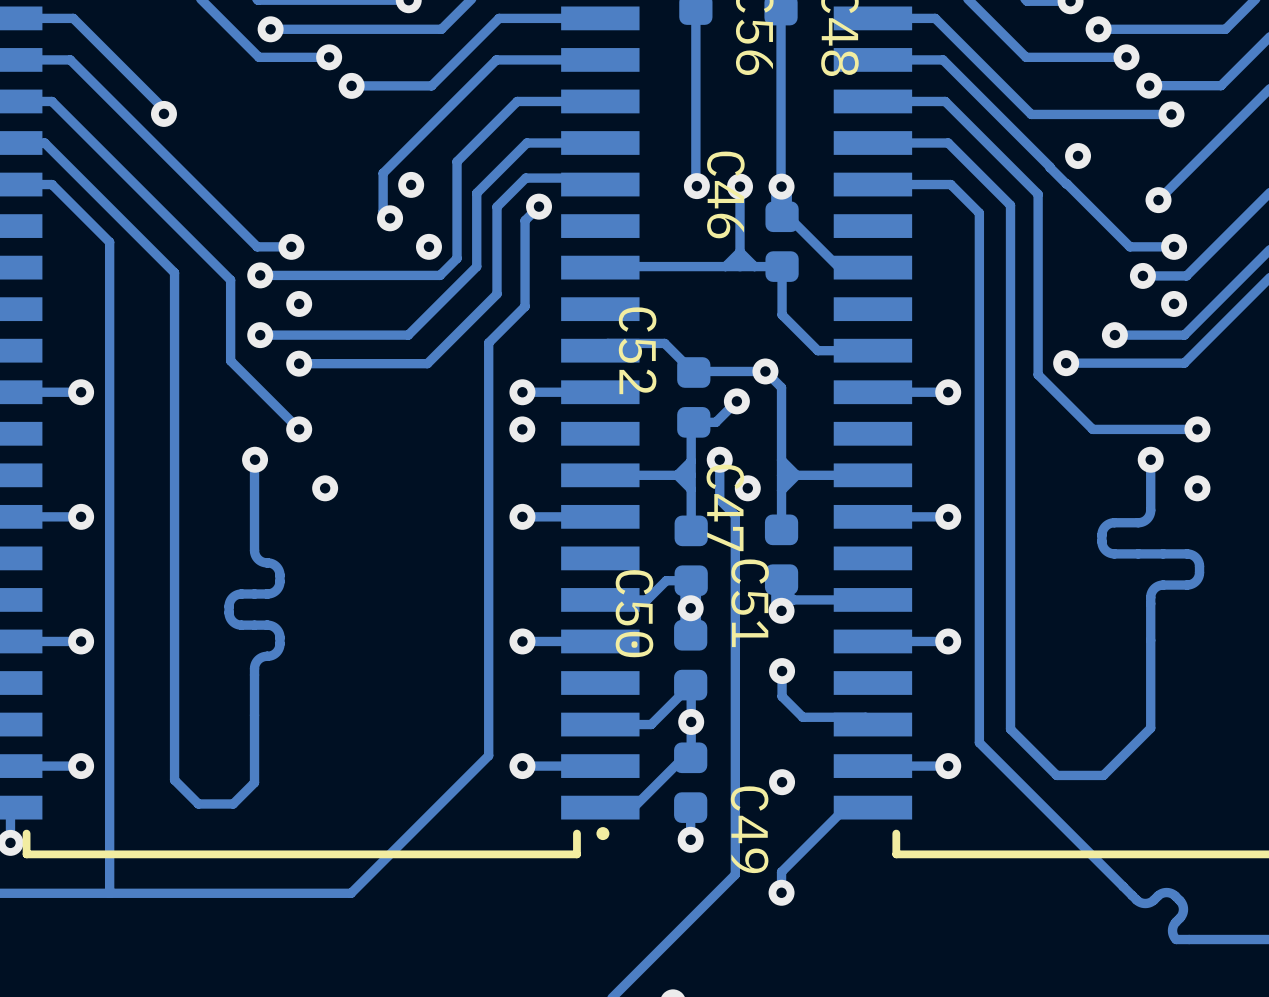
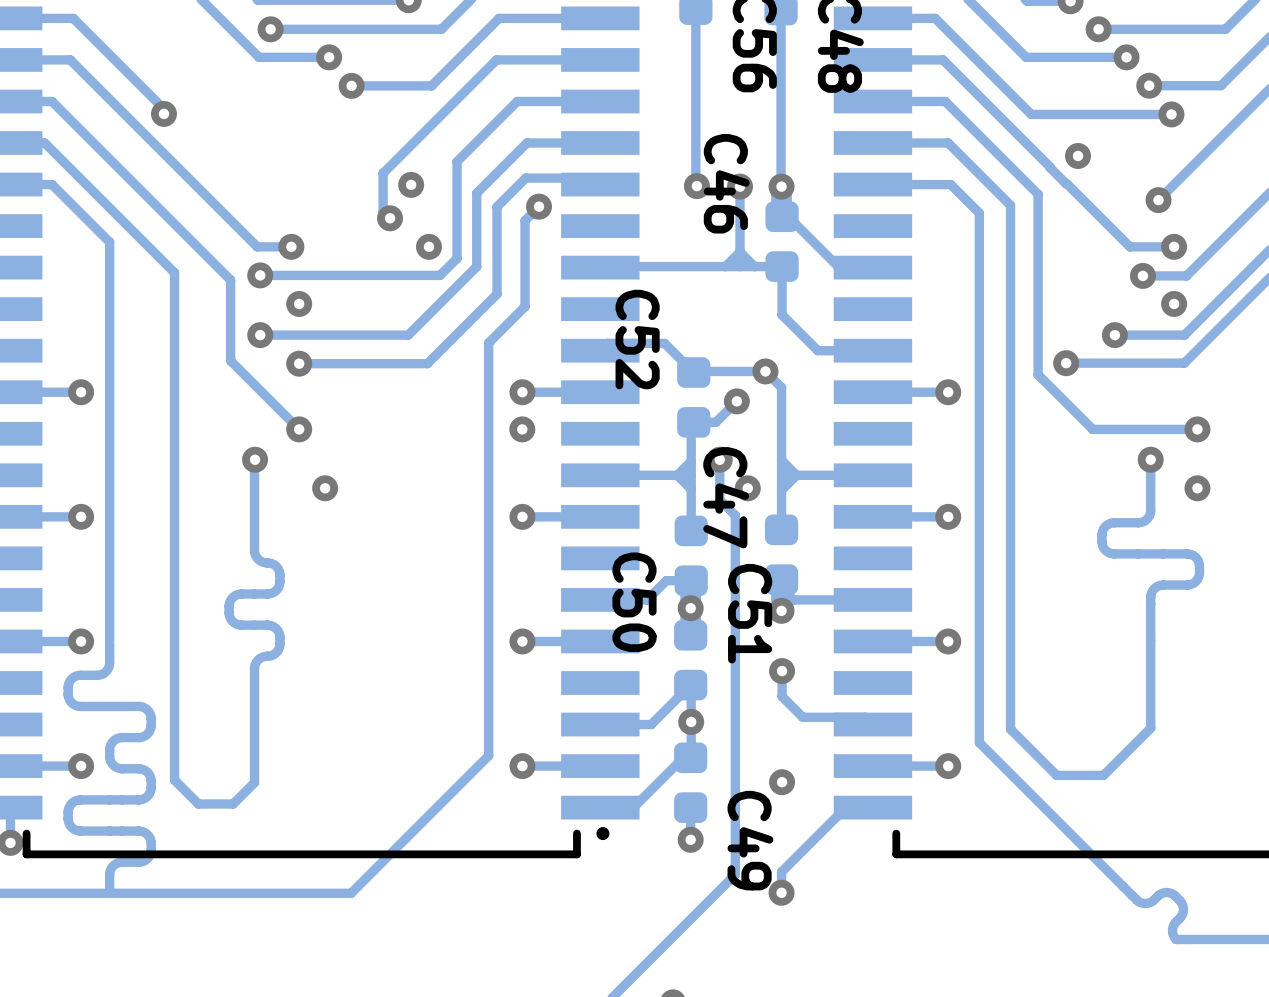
track: (109, 662) (109, 750) -> (109, 662) (107, 669) (102, 674) (79, 675) (71, 678) (68, 687) (70, 701) (79, 706) (141, 706) (148, 711) (151, 718) (150, 729) (146, 734) (140, 737) (118, 738) (111, 743) (109, 750)
track: (109, 756) (109, 874) -> (109, 756) (112, 764) (118, 768) (145, 770) (149, 774) (151, 781) (149, 792) (142, 799) (79, 799) (73, 801) (69, 806) (68, 822) (76, 830) (140, 831) (149, 836) (151, 851) (147, 858) (140, 862) (116, 863) (111, 868) (109, 874)

